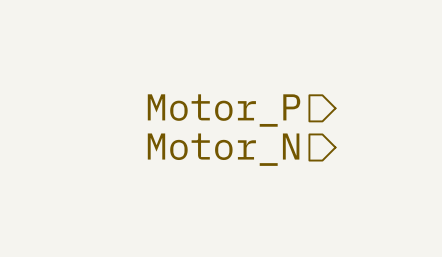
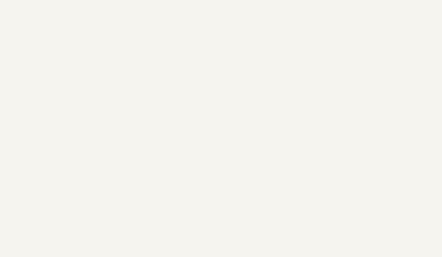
hierarchical label: Motor_P (224, 110) -> none
hierarchical label: Motor_N (223, 149) -> none

